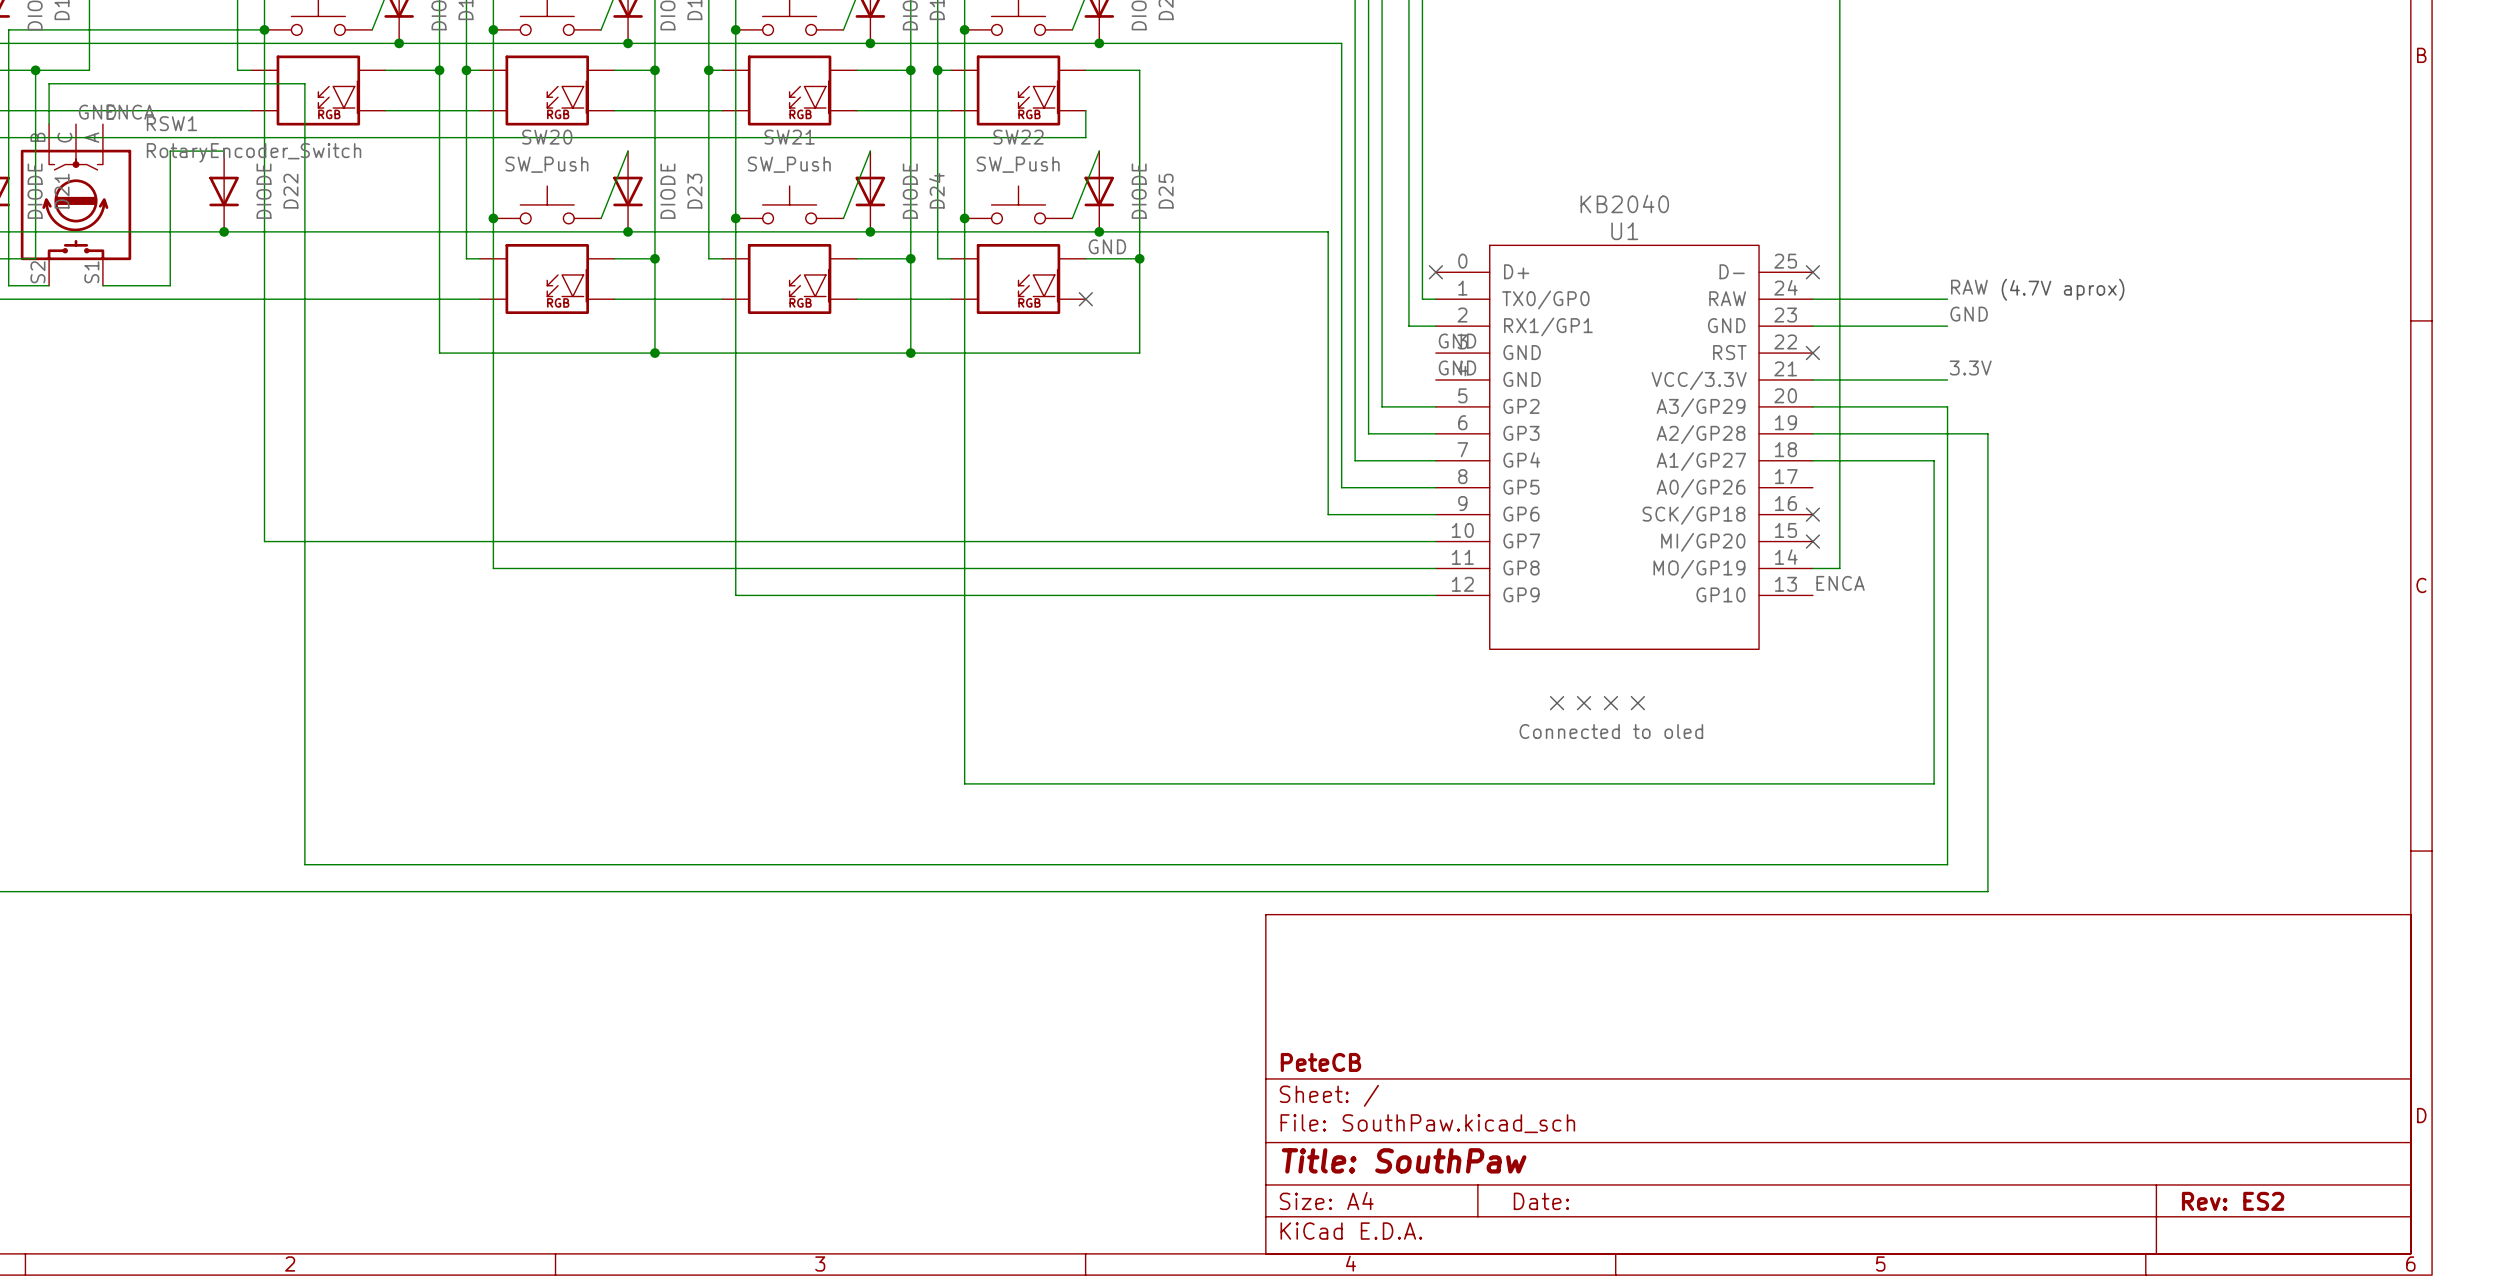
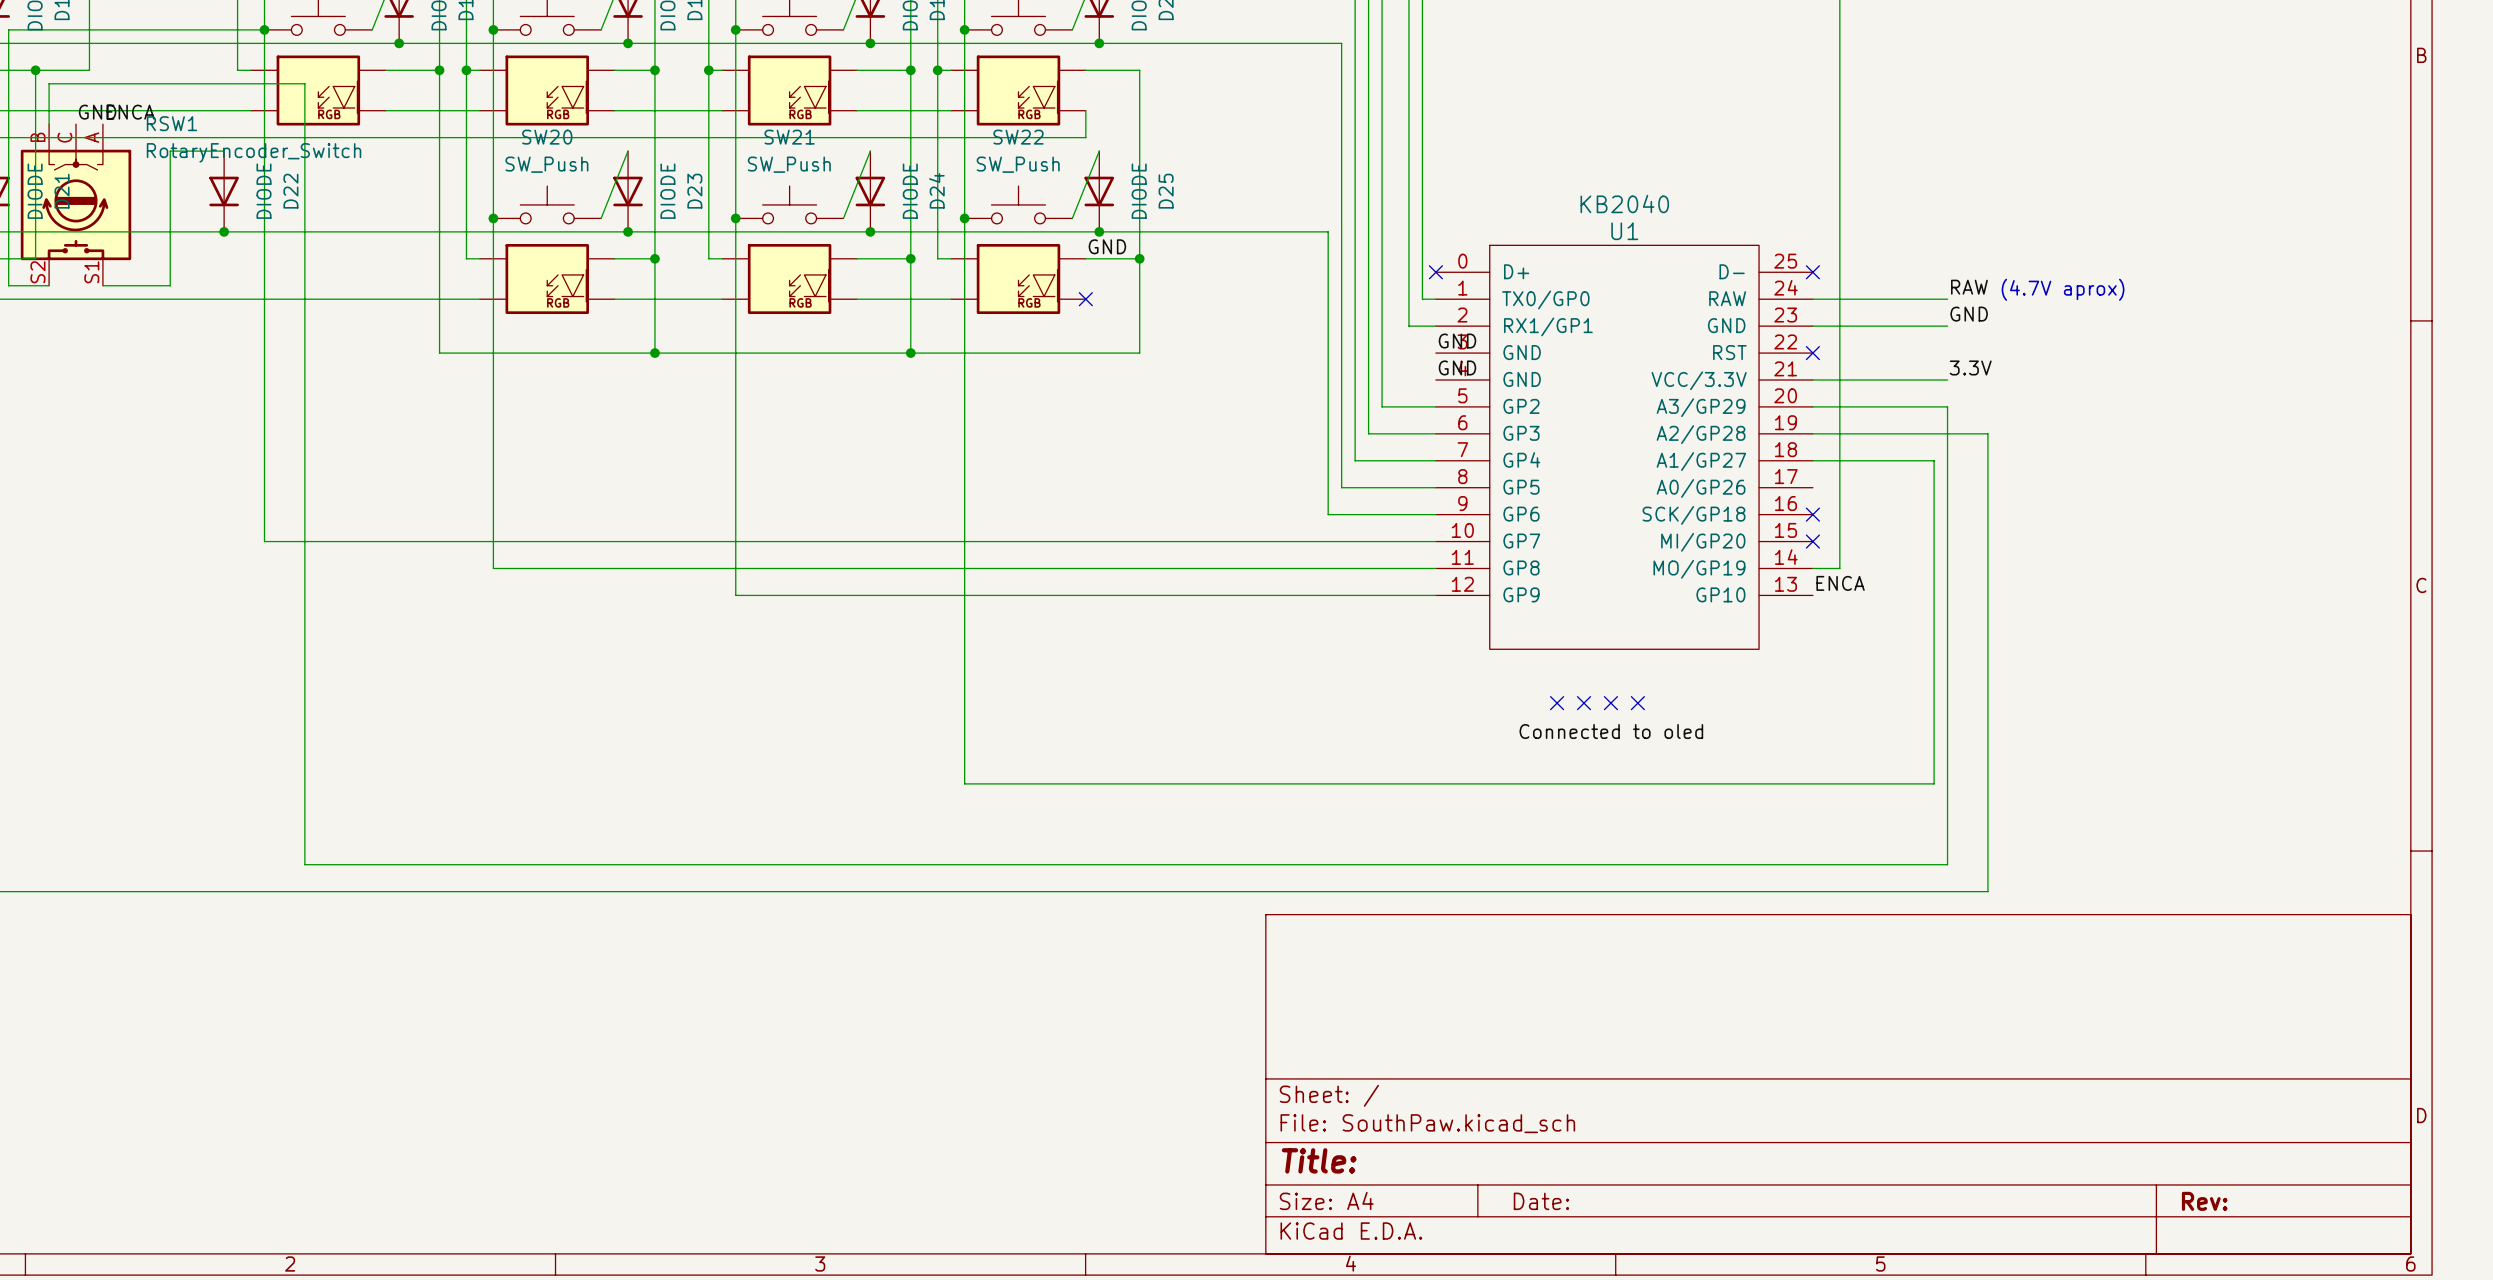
title block: PeteCB (1320, 1062) -> none
title block: Title: SouthPaw (1404, 1160) -> Title: (1319, 1160)
title block: Rev: ES2 (2233, 1201) -> Rev: (2204, 1201)

